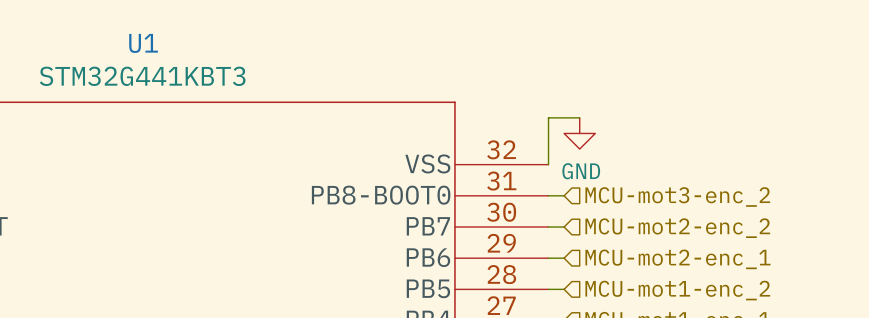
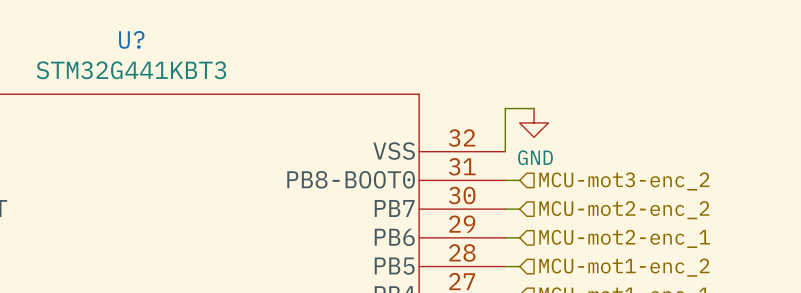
U1 name: U1 (143, 43) -> U? (131, 39)

